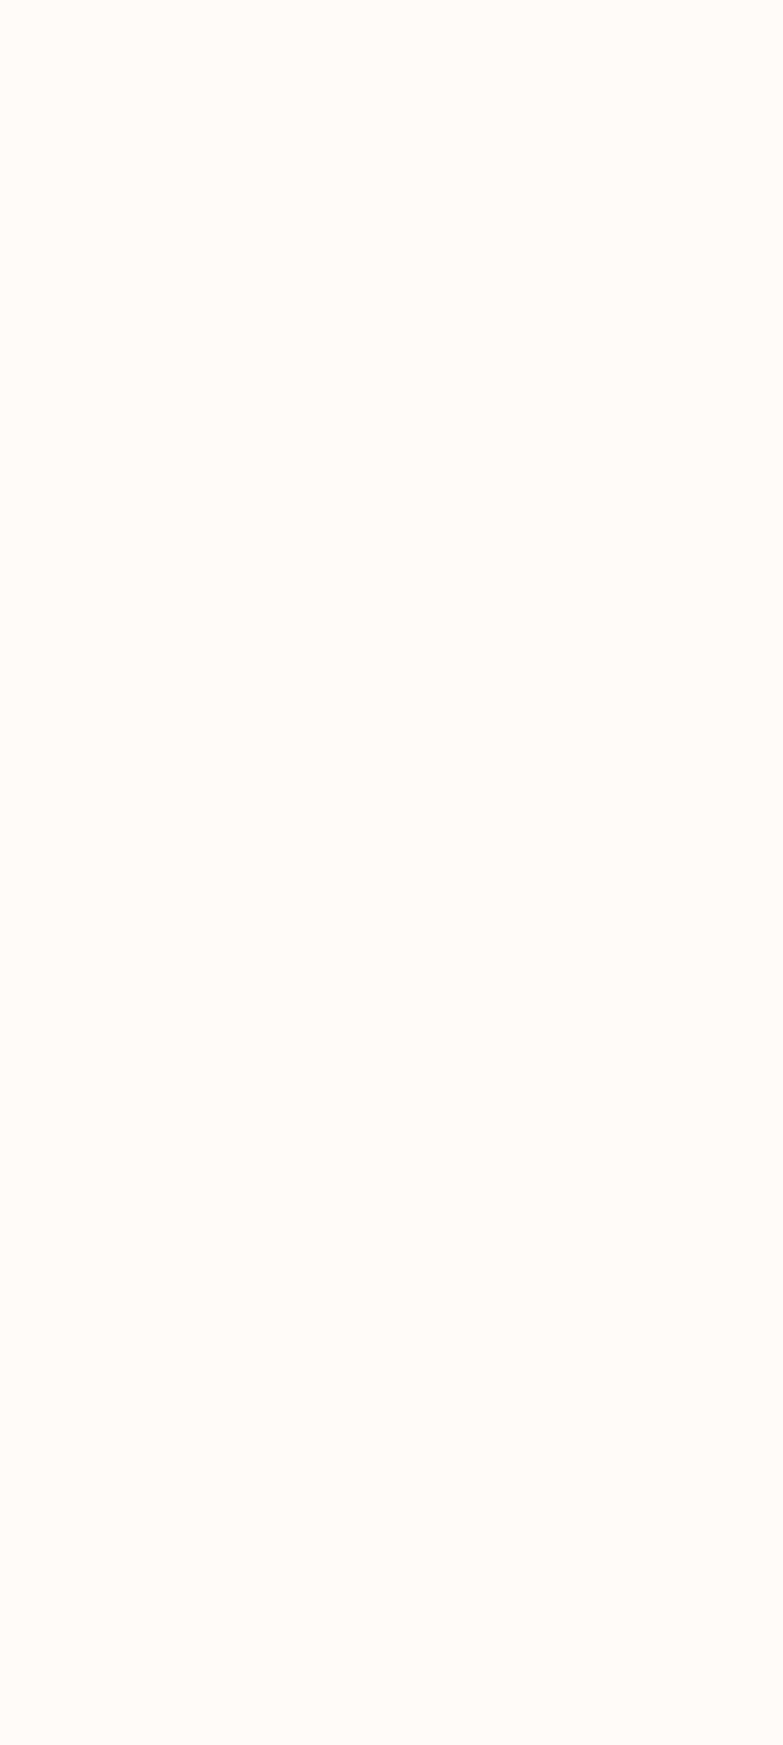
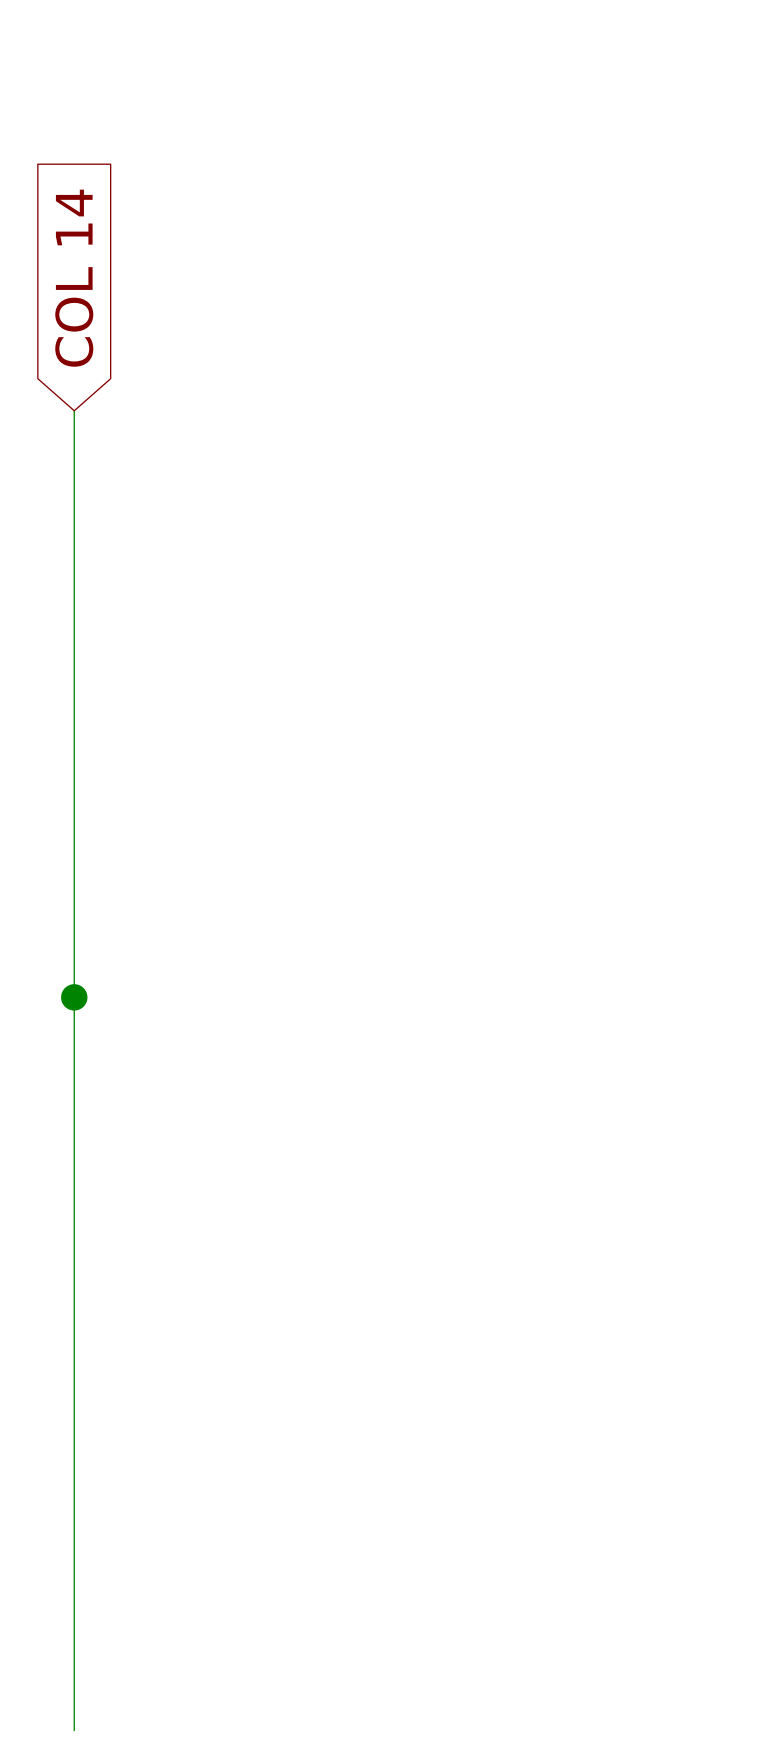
global label: none -> COL 14 (74, 278)
wire: none -> (74, 410) (74, 1730)
junction: none -> (74, 997)

